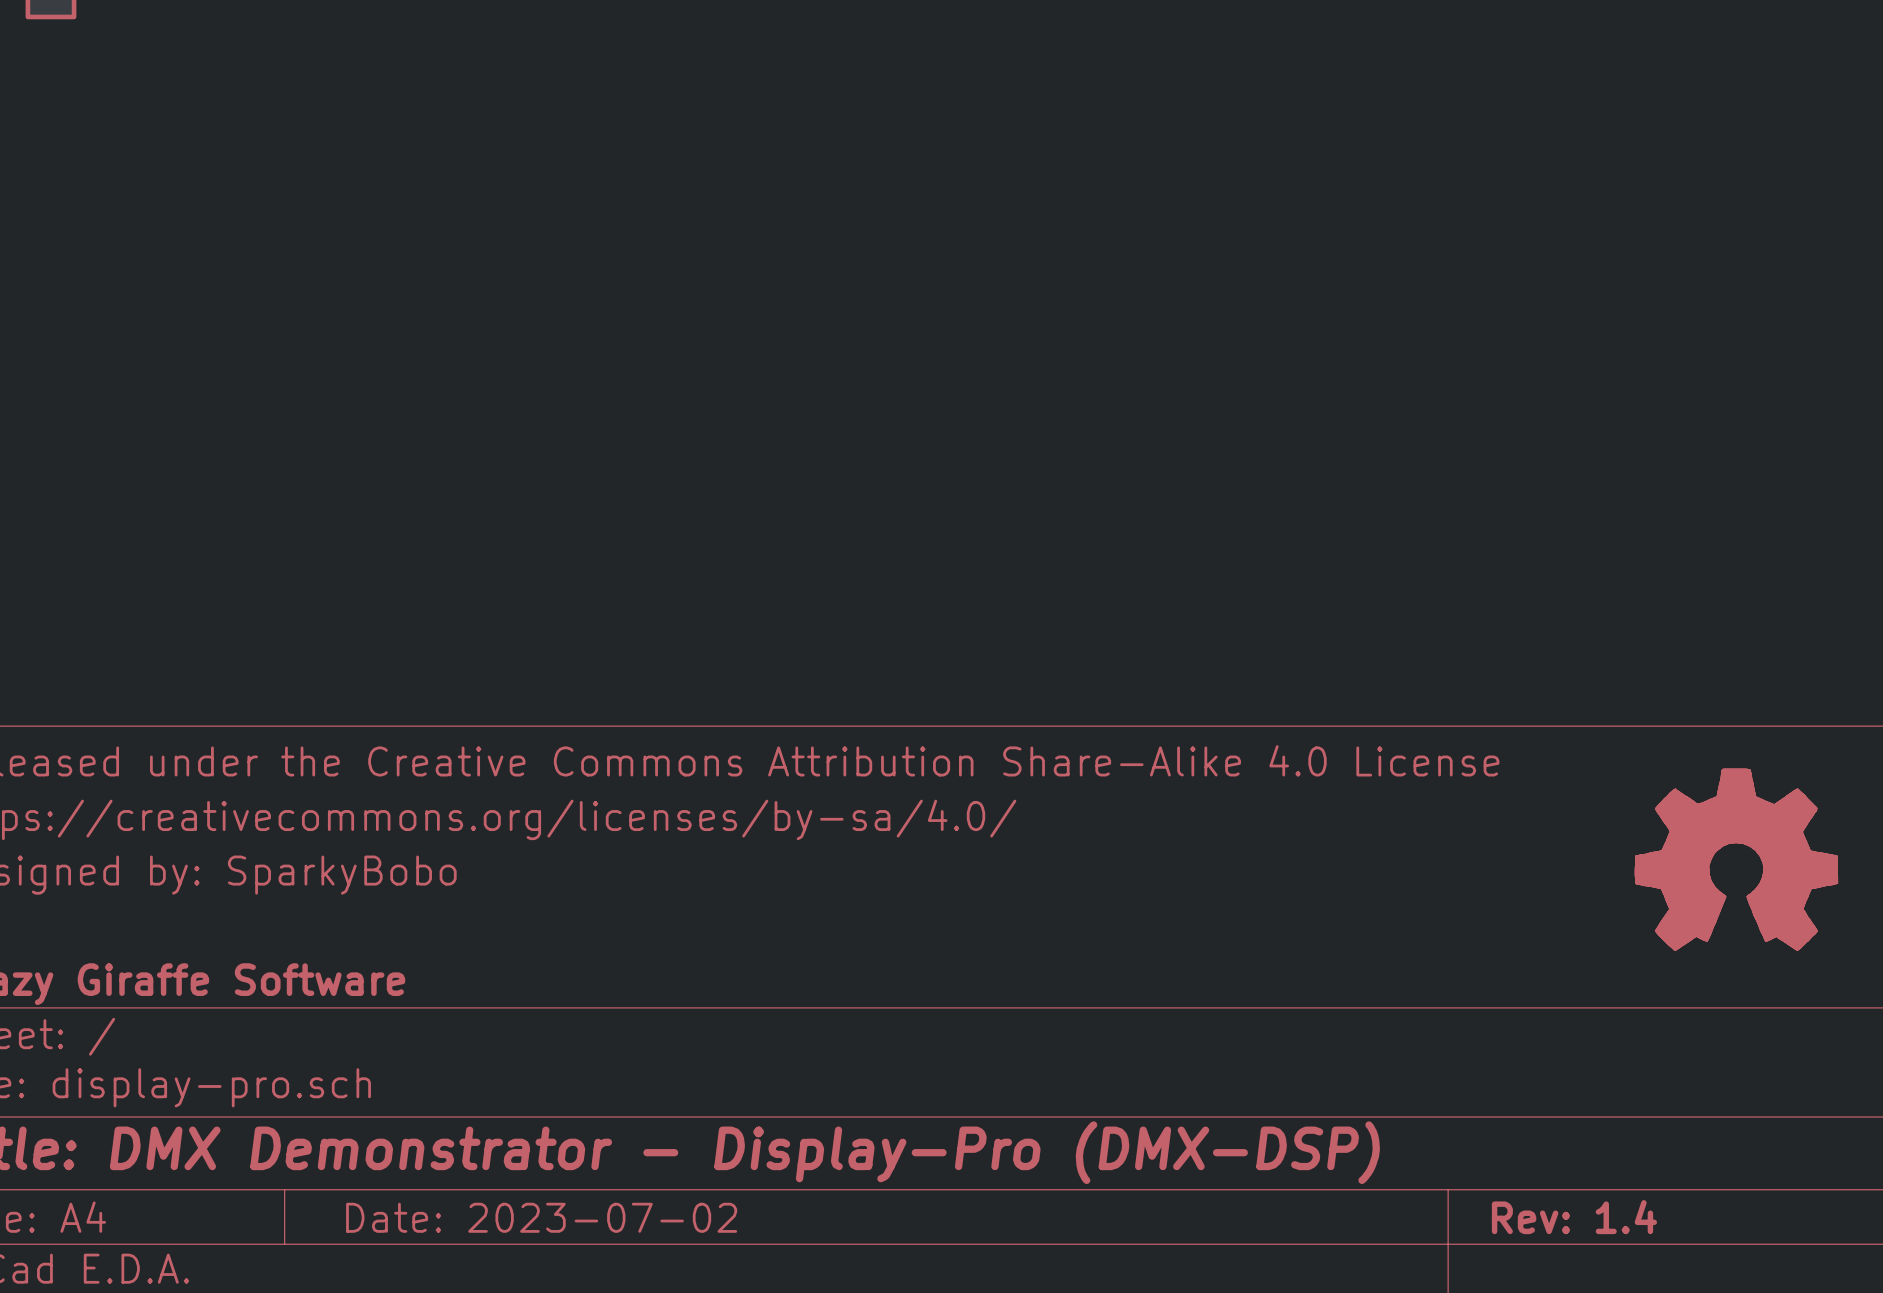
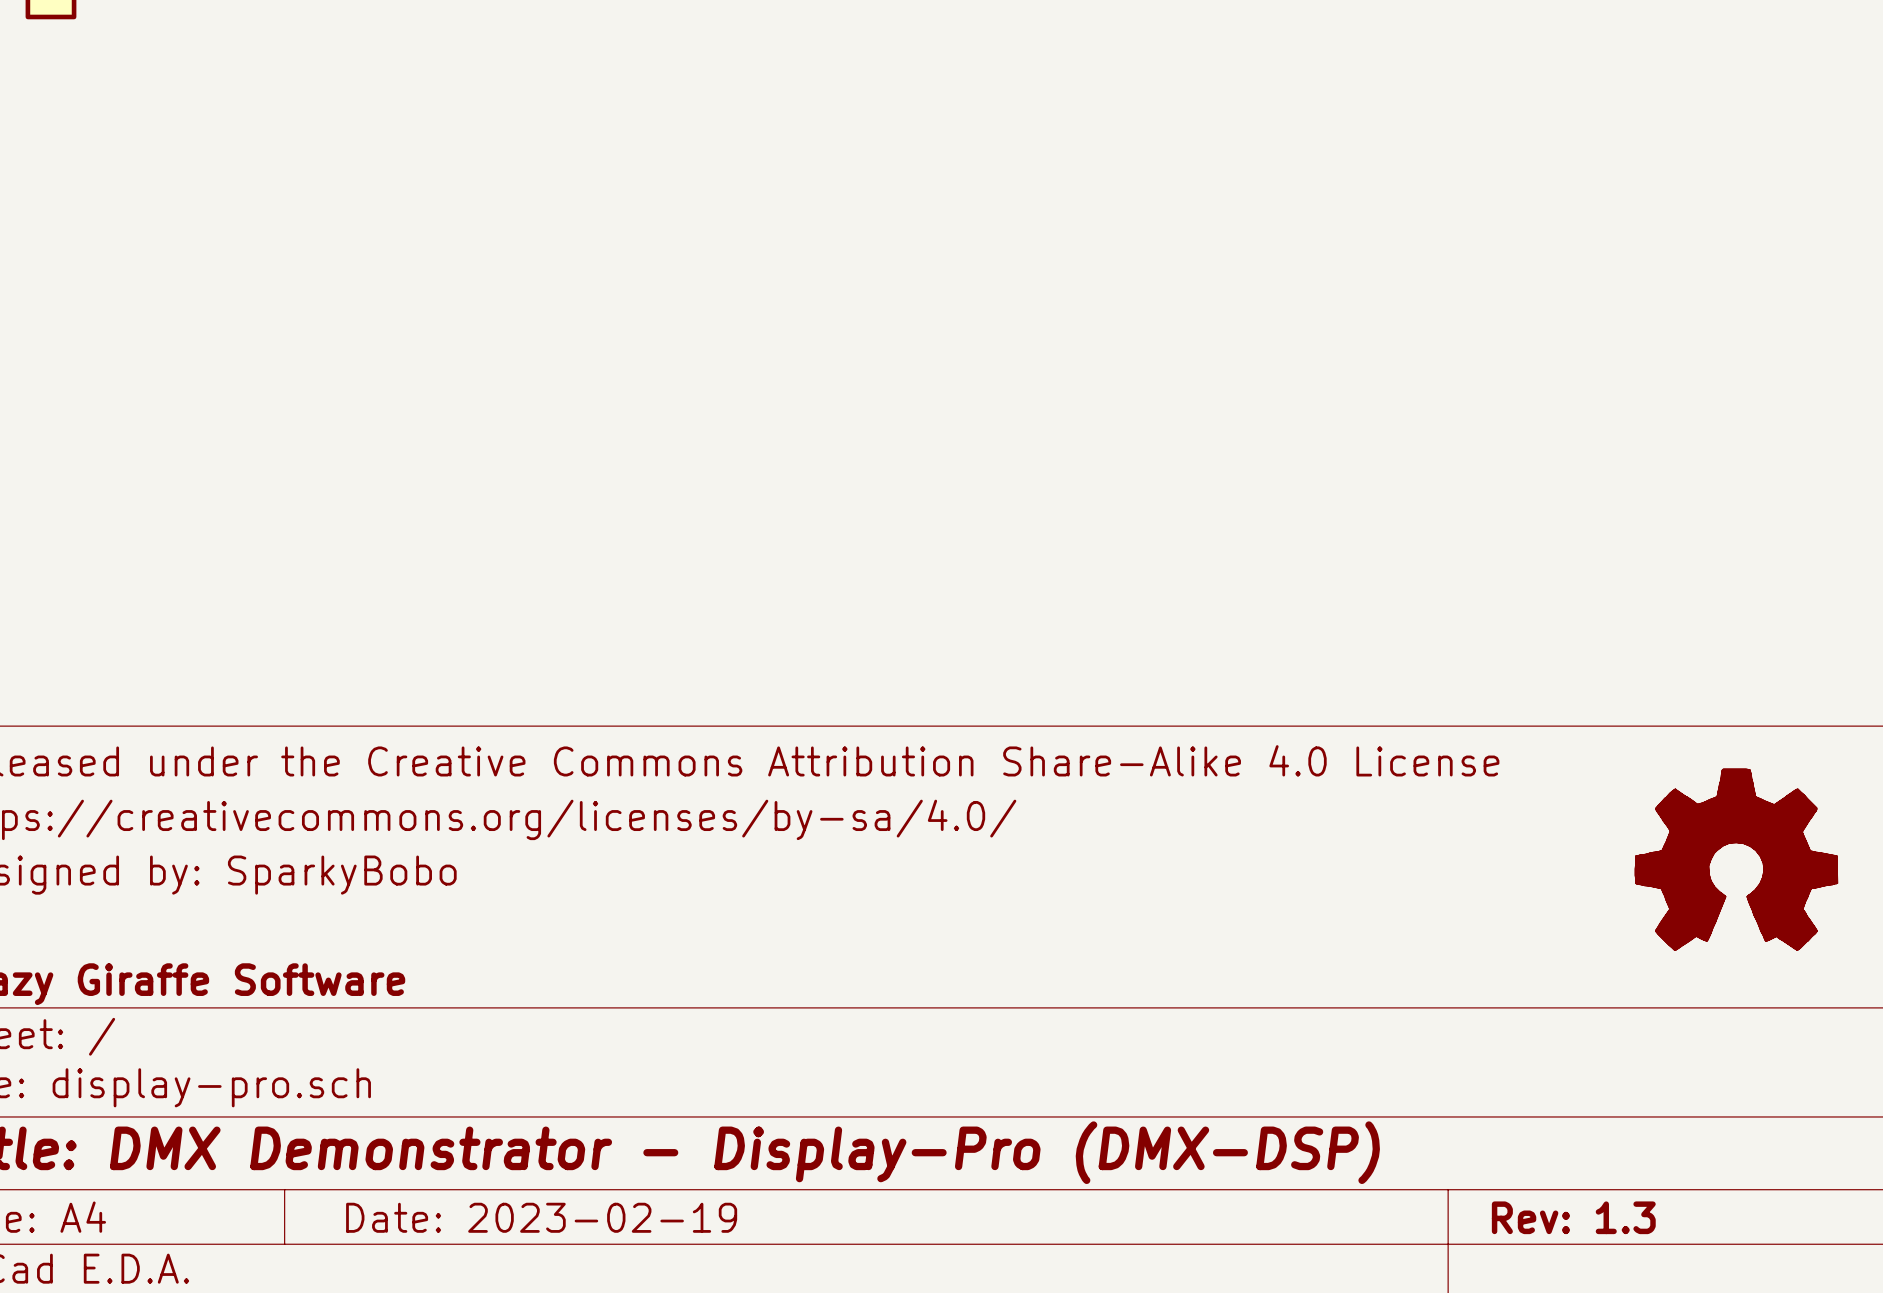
title block: Date: 2023-07-02 (541, 1217) -> Date: 2023-02-19 (541, 1217)
title block: Rev: 1.4 (1574, 1217) -> Rev: 1.3 (1573, 1217)

